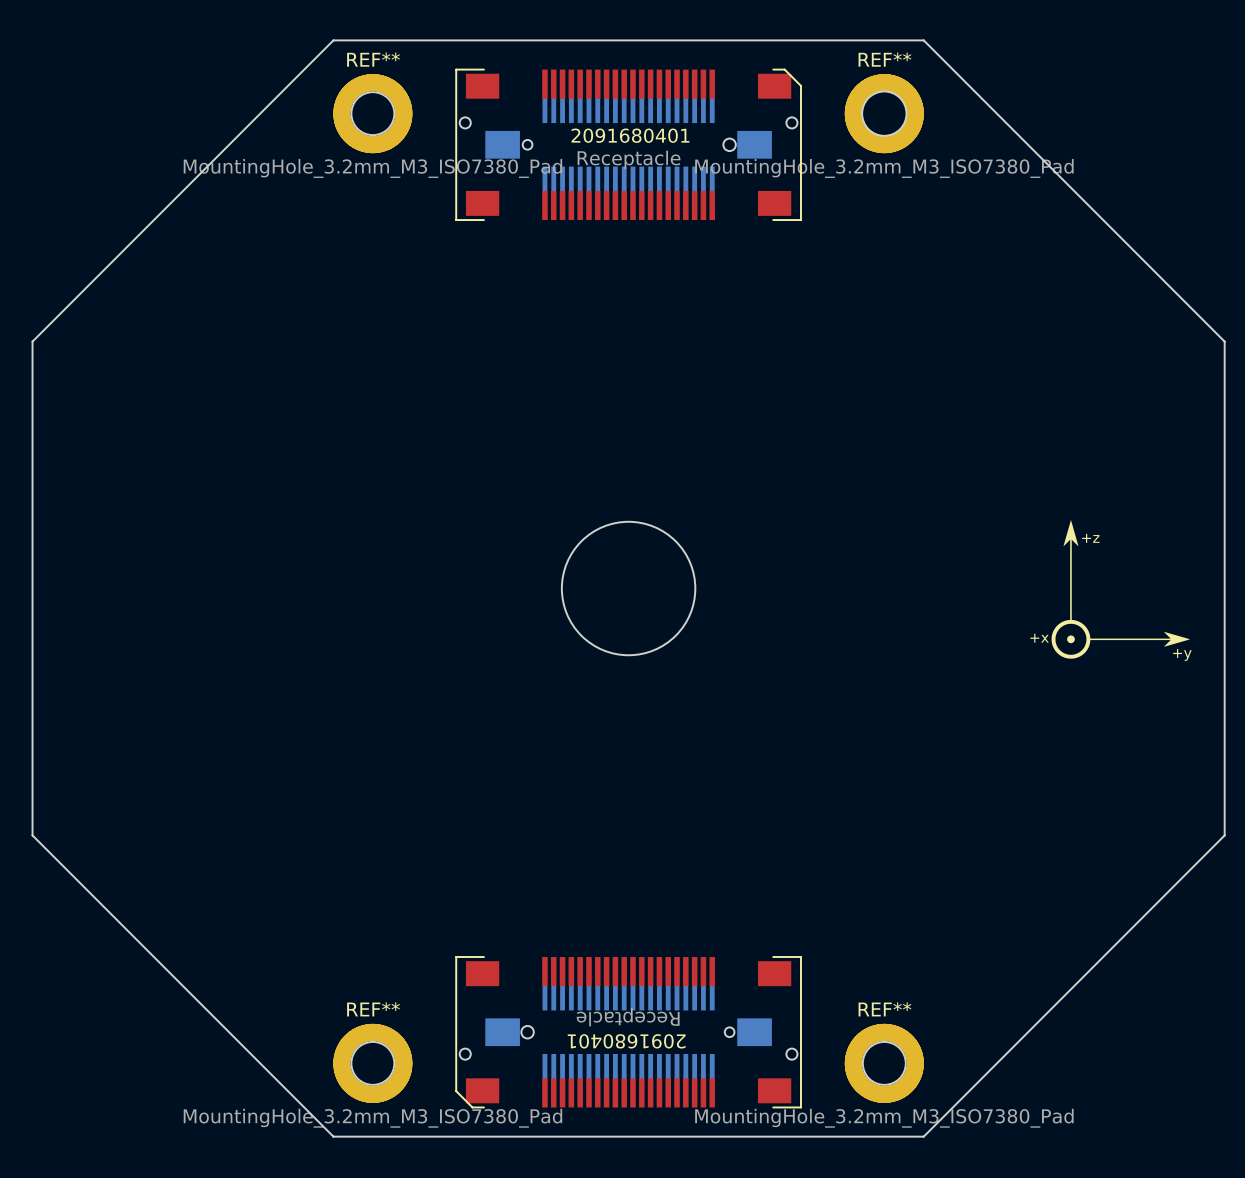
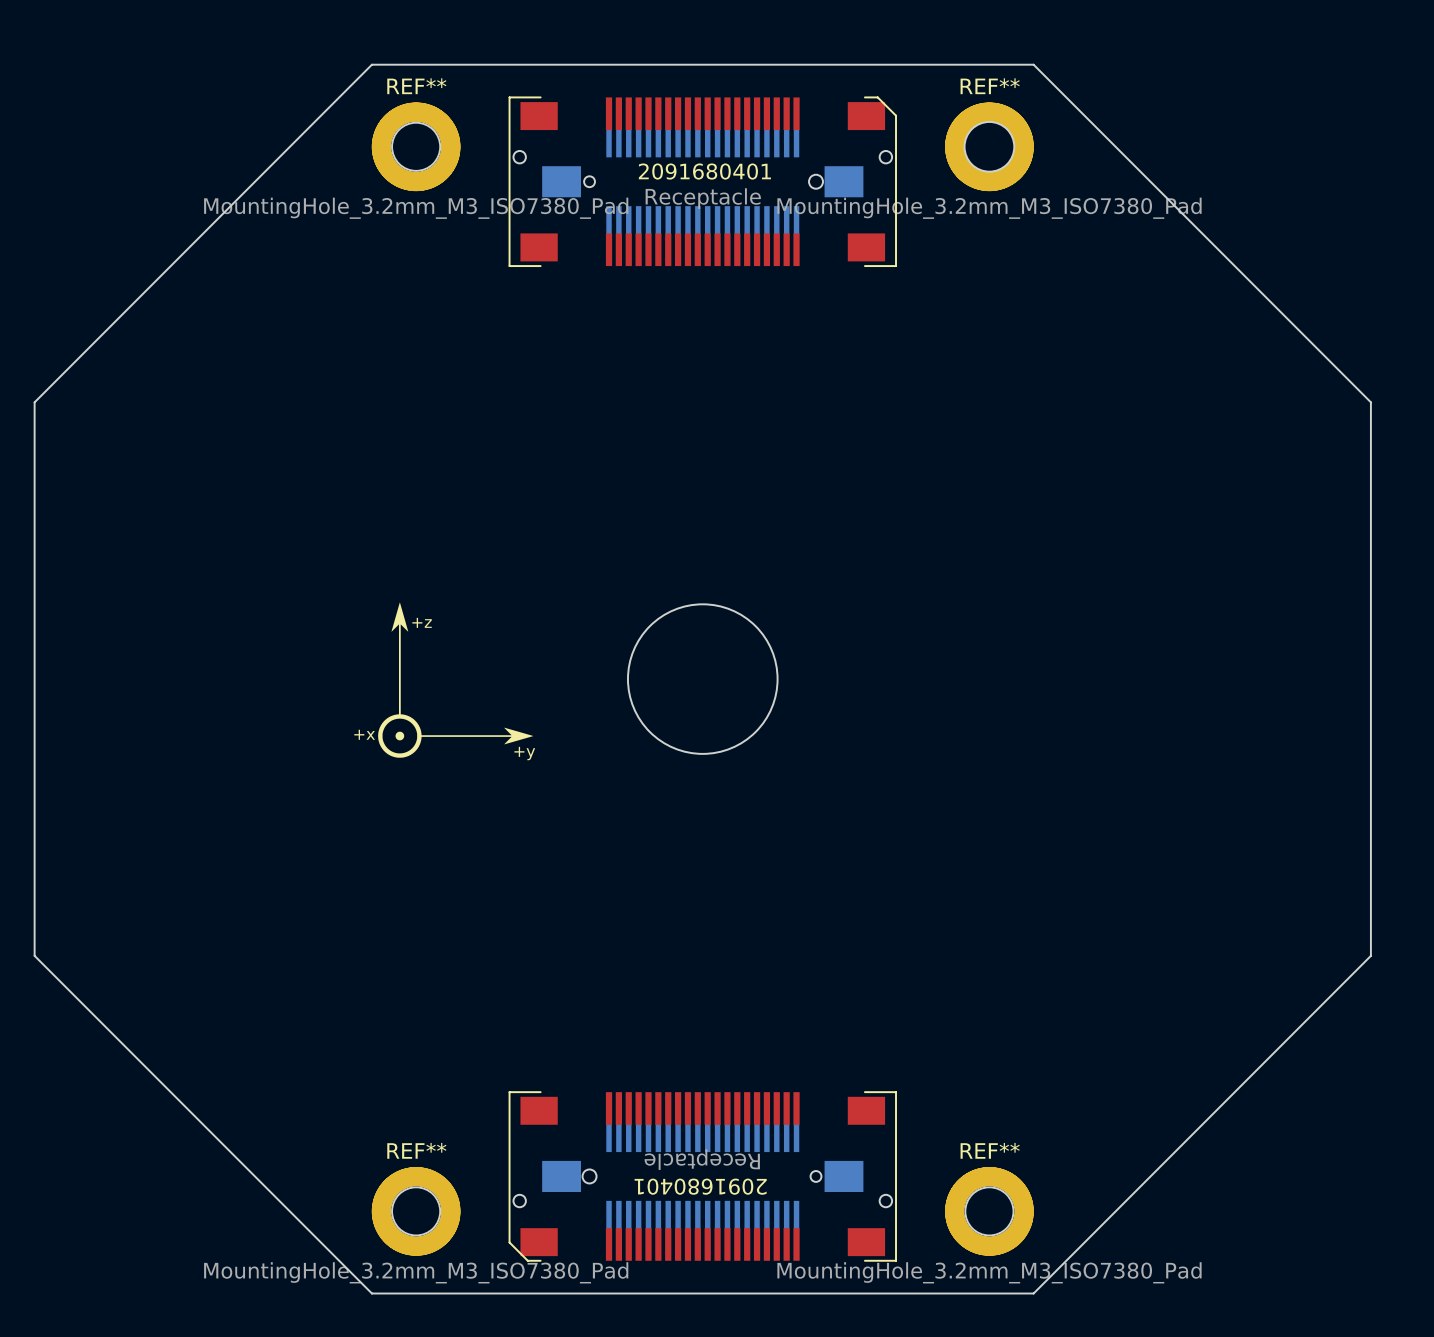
drawing: none -> [378, 602, 534, 758]
drawing: [1051, 520, 1191, 659] -> none
text: none -> +z (422, 622)
text: +z (1090, 538) -> none
text: none -> +x (364, 734)
text: +x (1039, 638) -> none
text: none -> +y (524, 753)
text: +y (1182, 654) -> none

